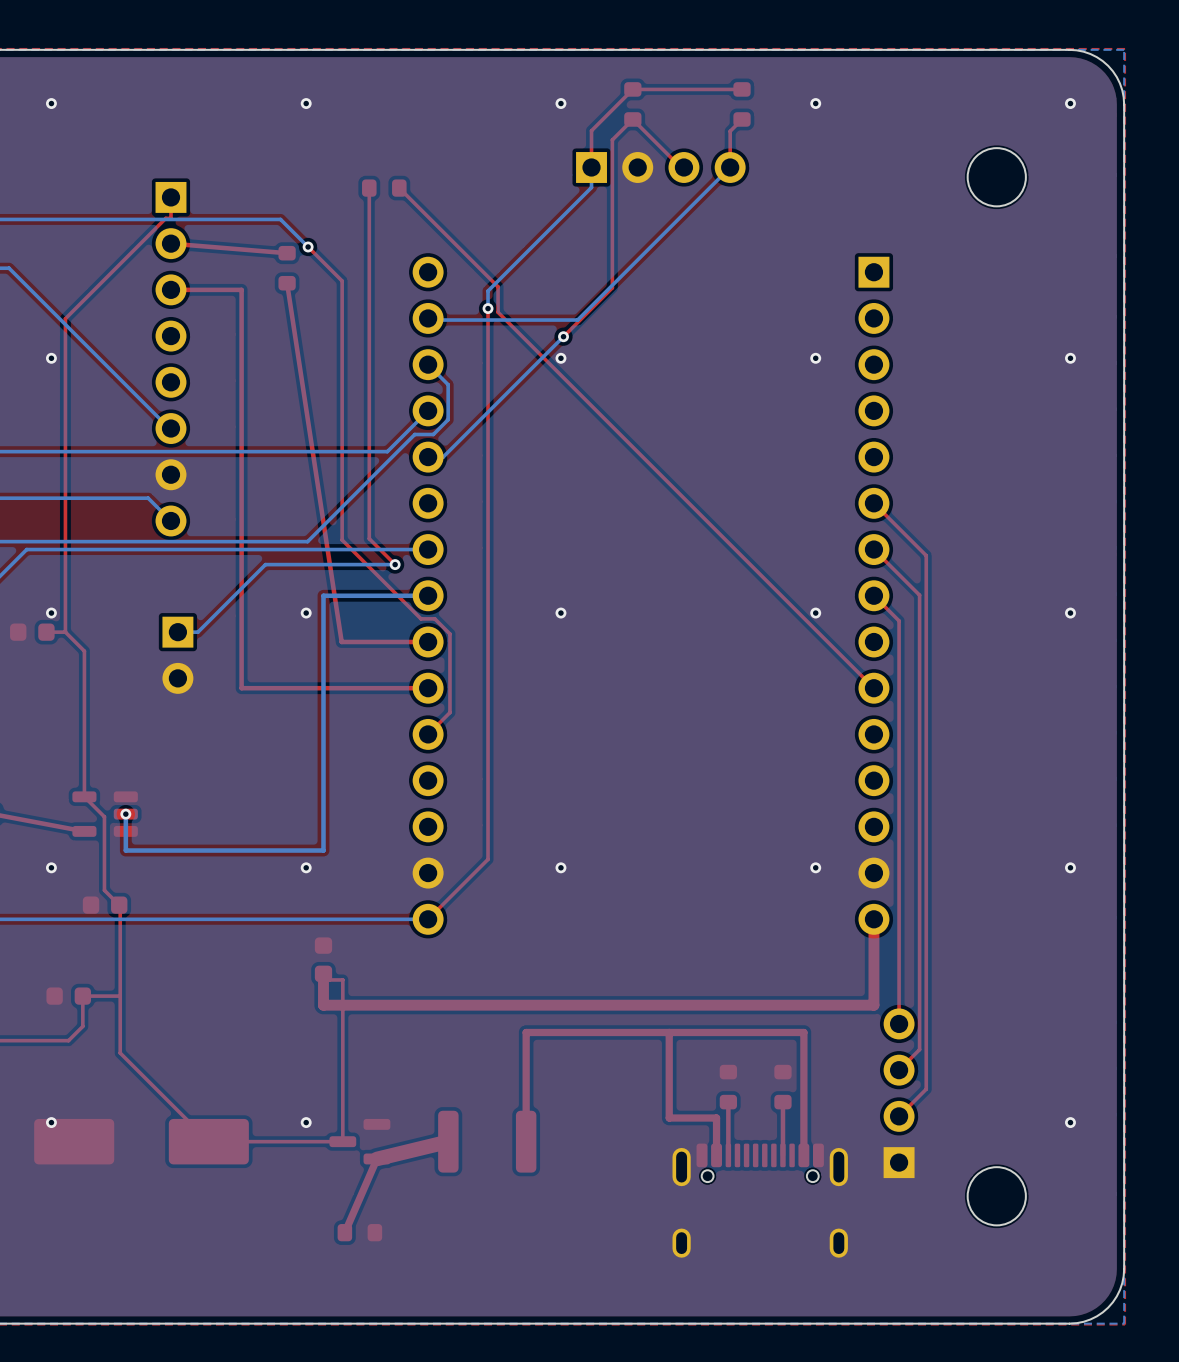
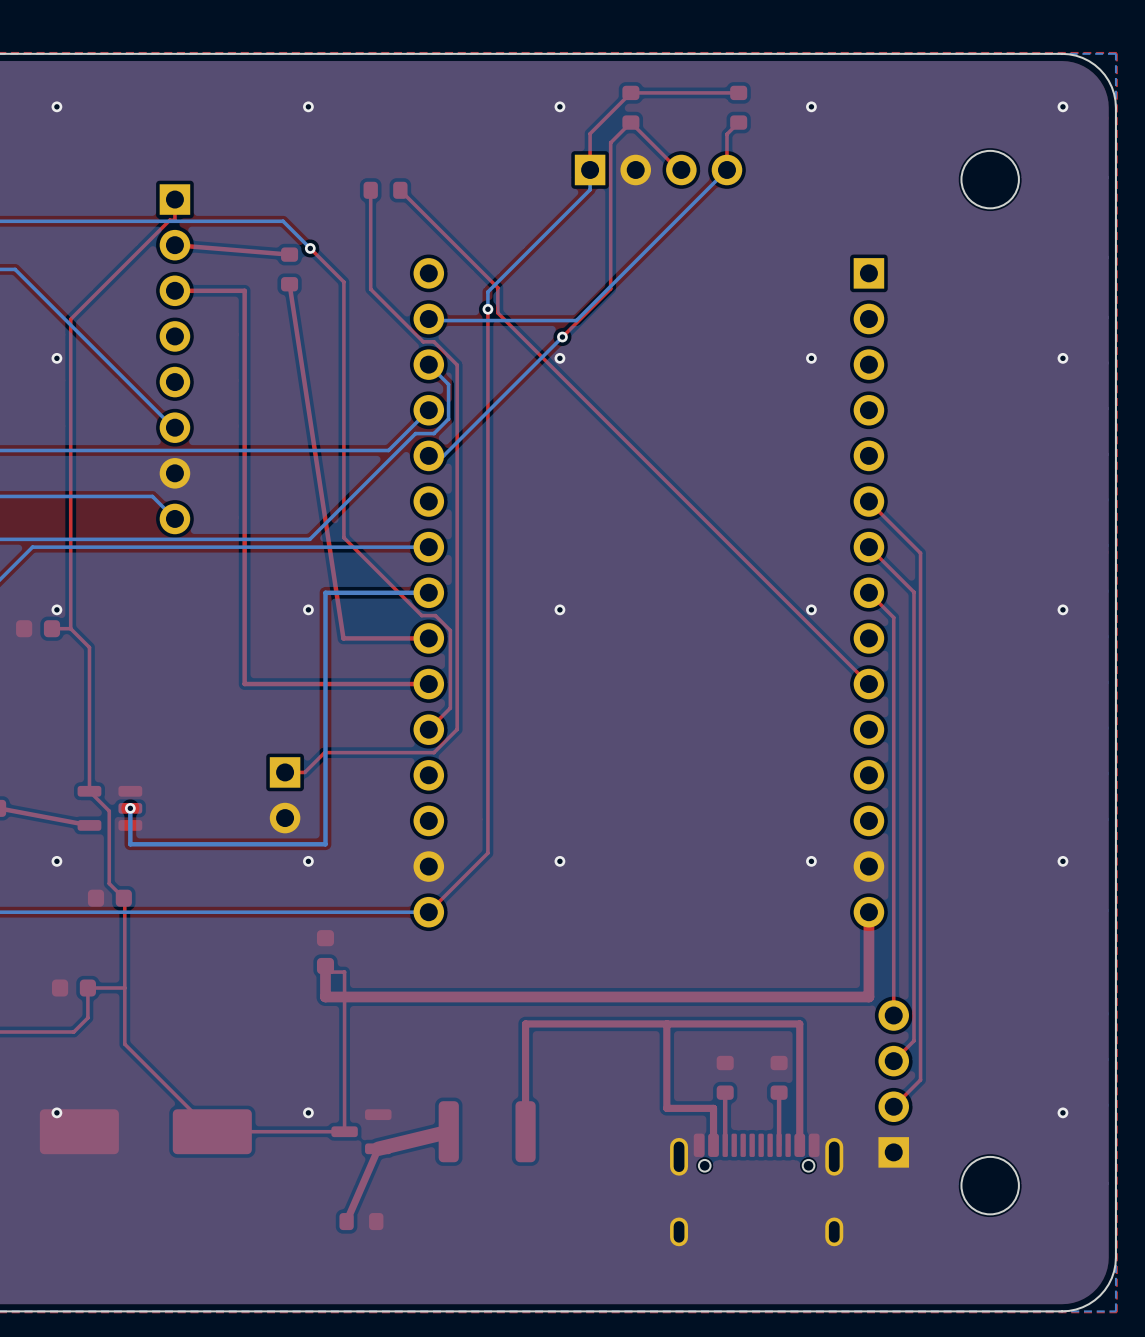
top track: (369, 288) (369, 538) (395, 564) -> (370, 289) (423, 341) (433, 341) (457, 365) (457, 729) (433, 752) (324, 752) (304, 772) (285, 772)
bottom track: (395, 564) (265, 564) (197, 632) (177, 632) -> none
via: (395, 564) -> none
part position: (177, 655) -> (285, 795)

